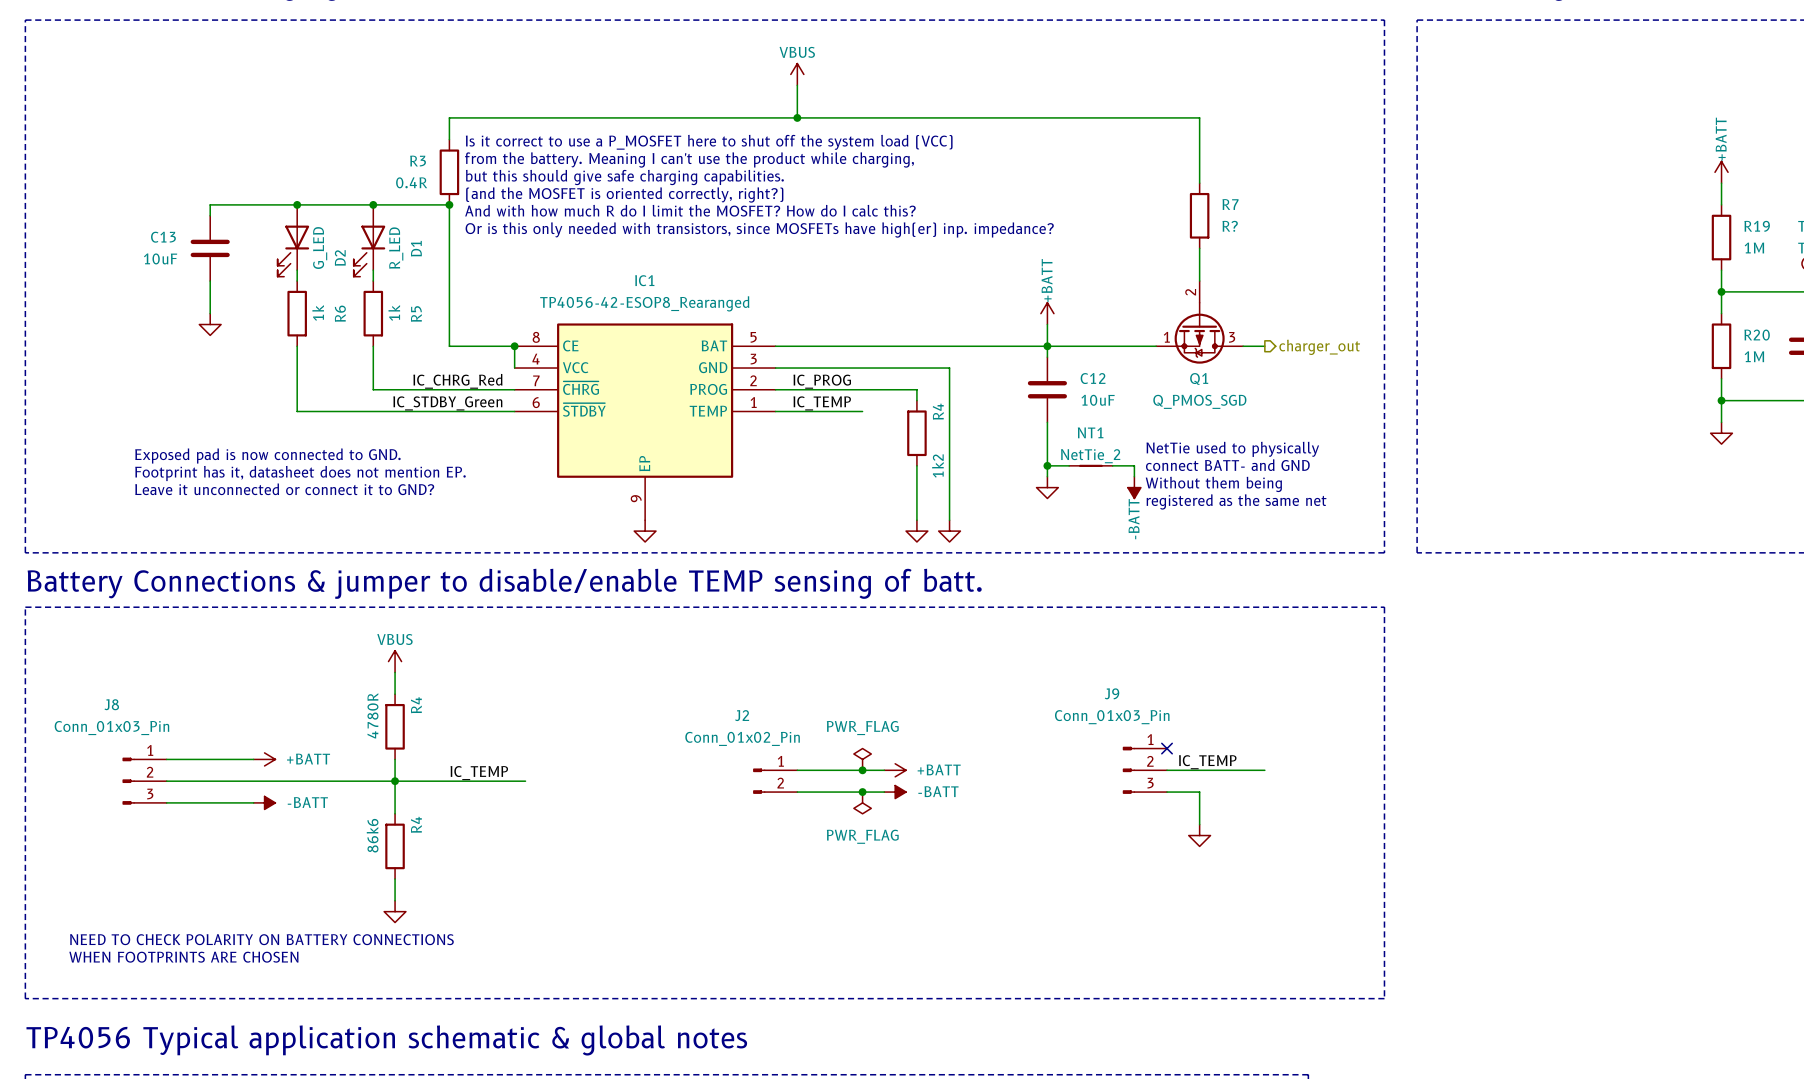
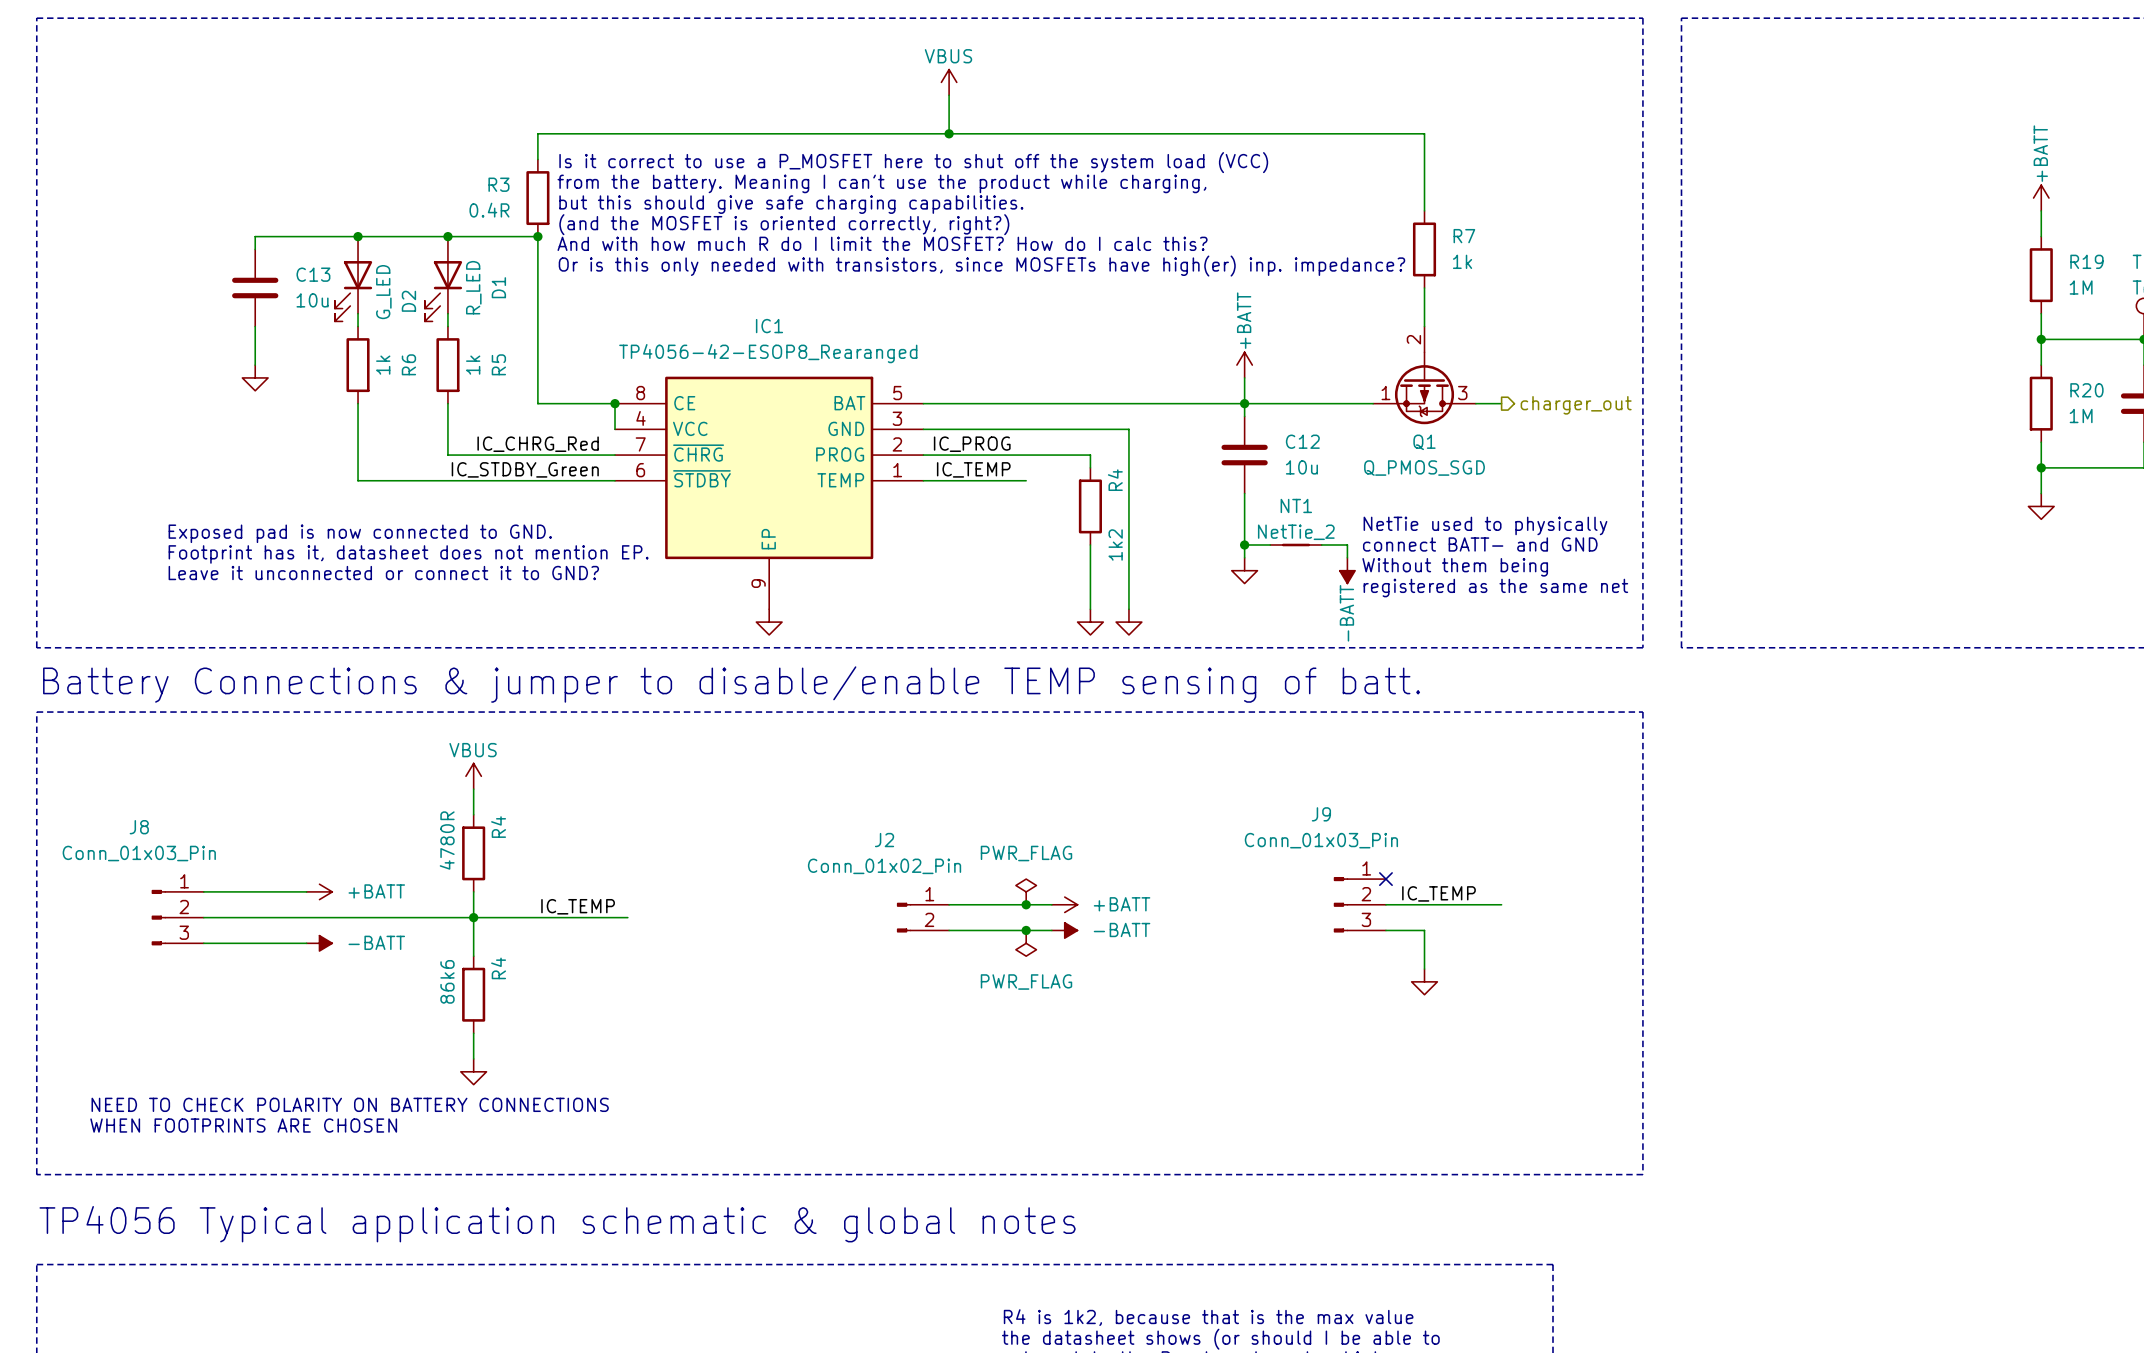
R7 value: R? (1230, 226) -> 1k (1462, 261)
C13 name position: C13 (163, 237) -> C13 (313, 274)
C13 value: 10uF (160, 258) -> 10u (312, 300)
C12 value: 10uF (1098, 400) -> 10u (1301, 467)

